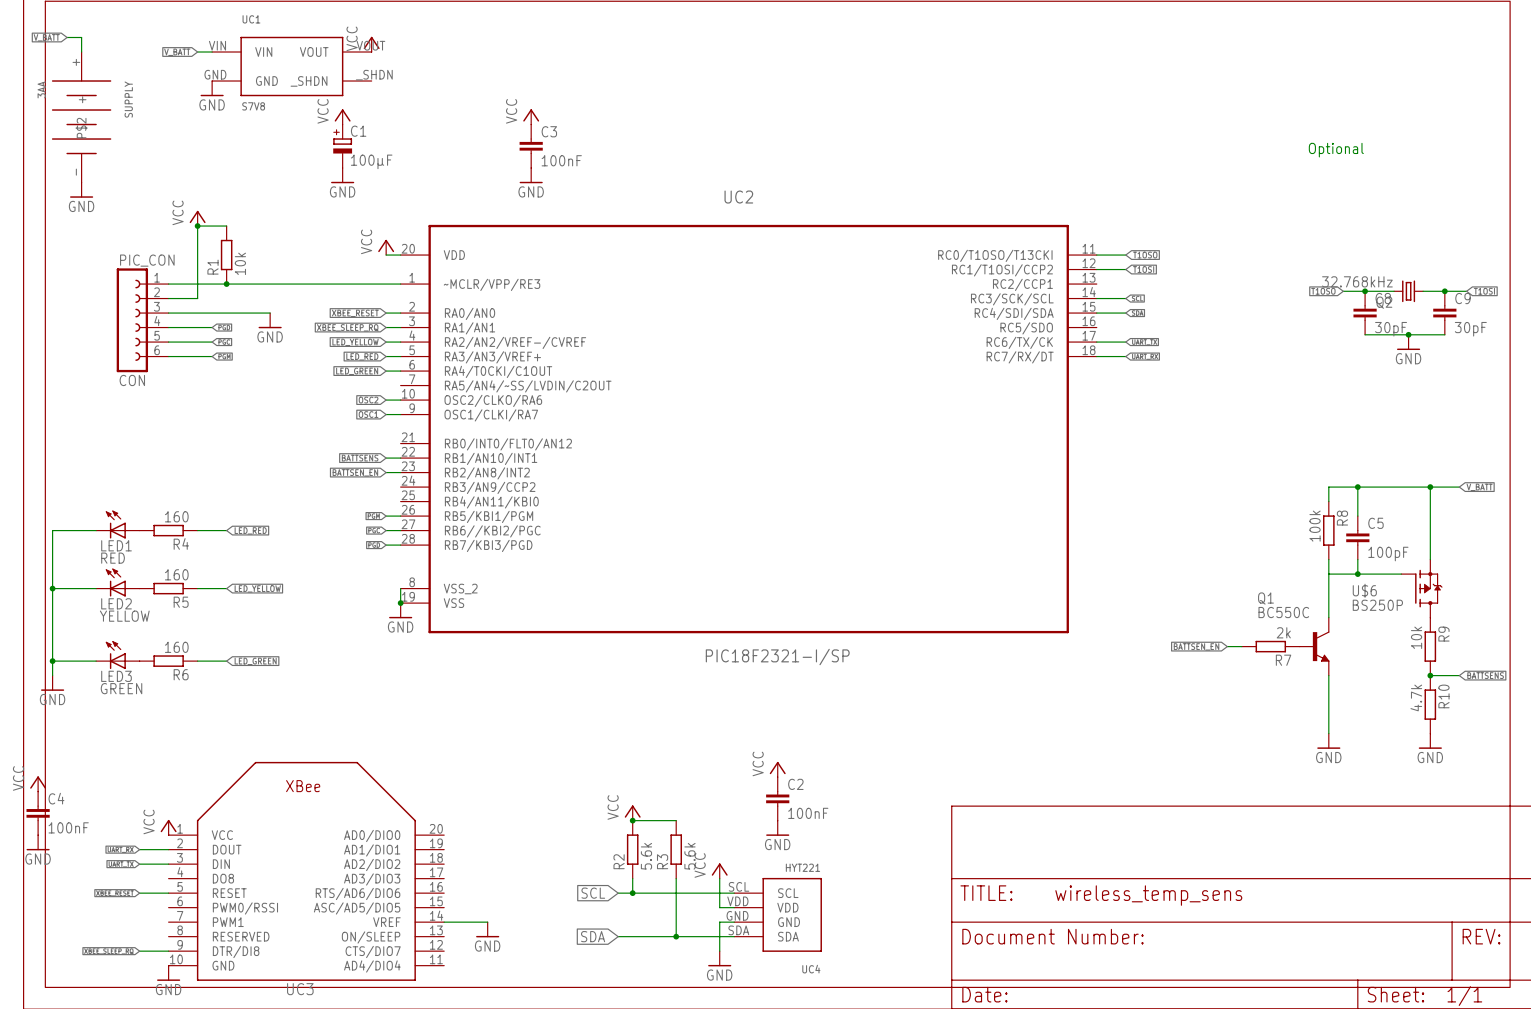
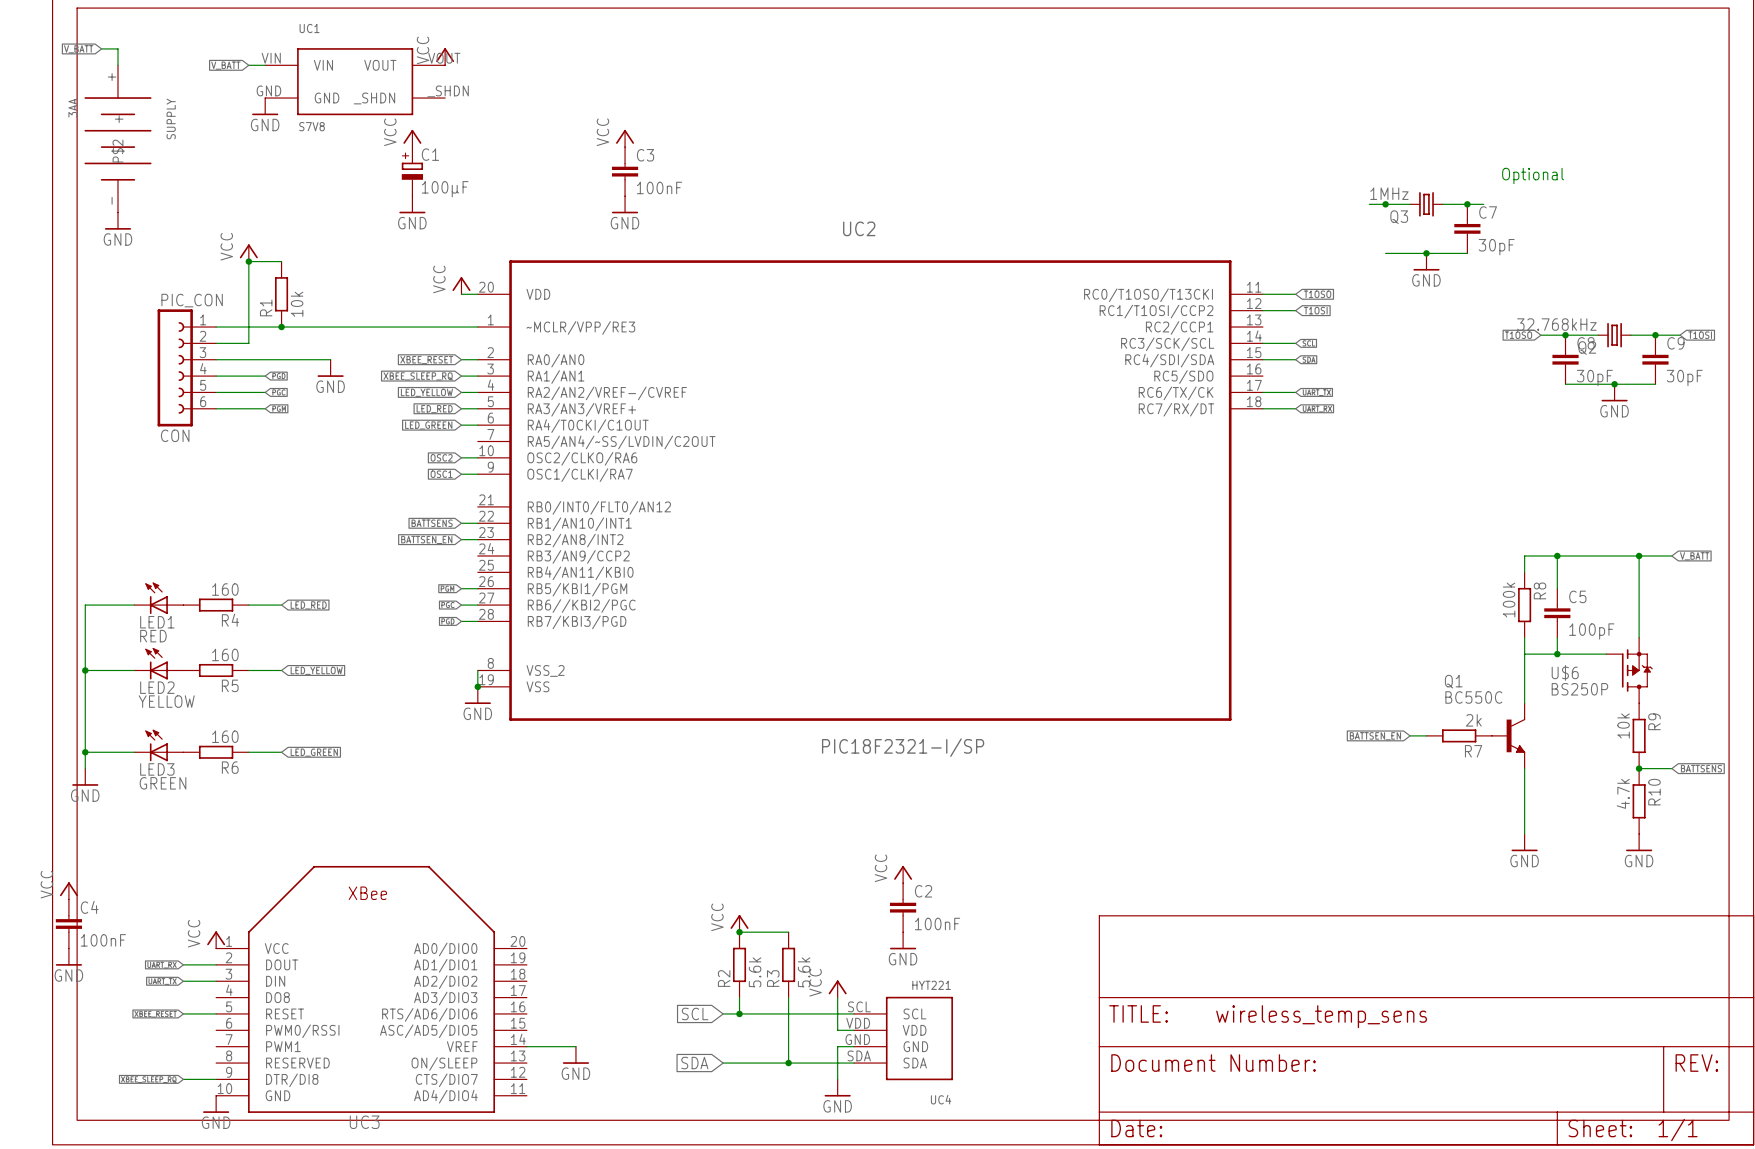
wire: none -> (1369, 204) (1410, 204)
junction: none -> (1385, 204)
Q3: none -> 1MHz (1426, 204)
wire: none -> (1442, 204) (1483, 204)
junction: none -> (1467, 204)
C7: none -> 30pF (1467, 228)
wire: none -> (1385, 253) (1467, 253)
junction: none -> (1426, 253)
power symbol: none -> GND (1426, 261)

